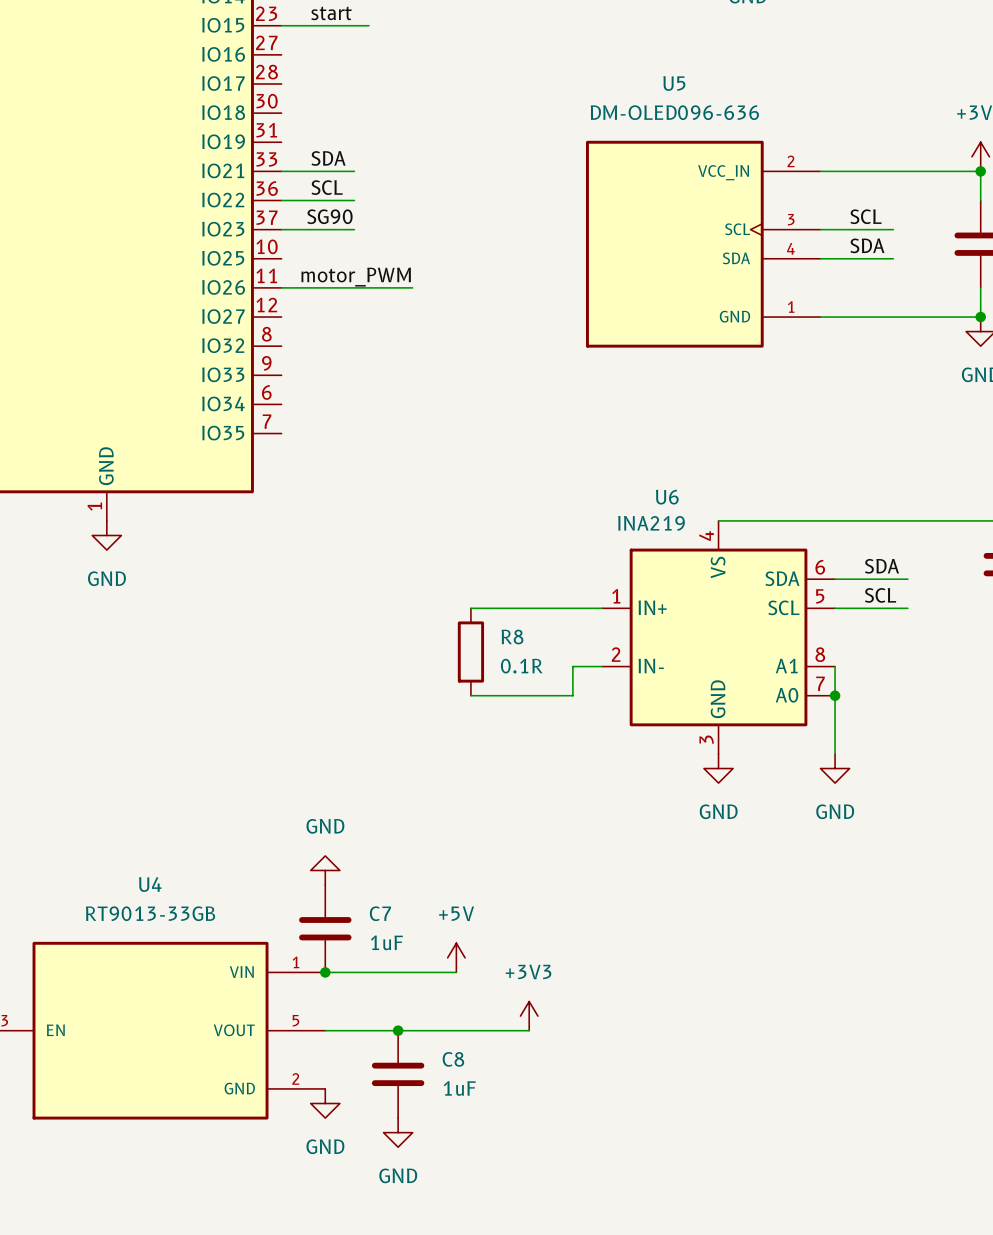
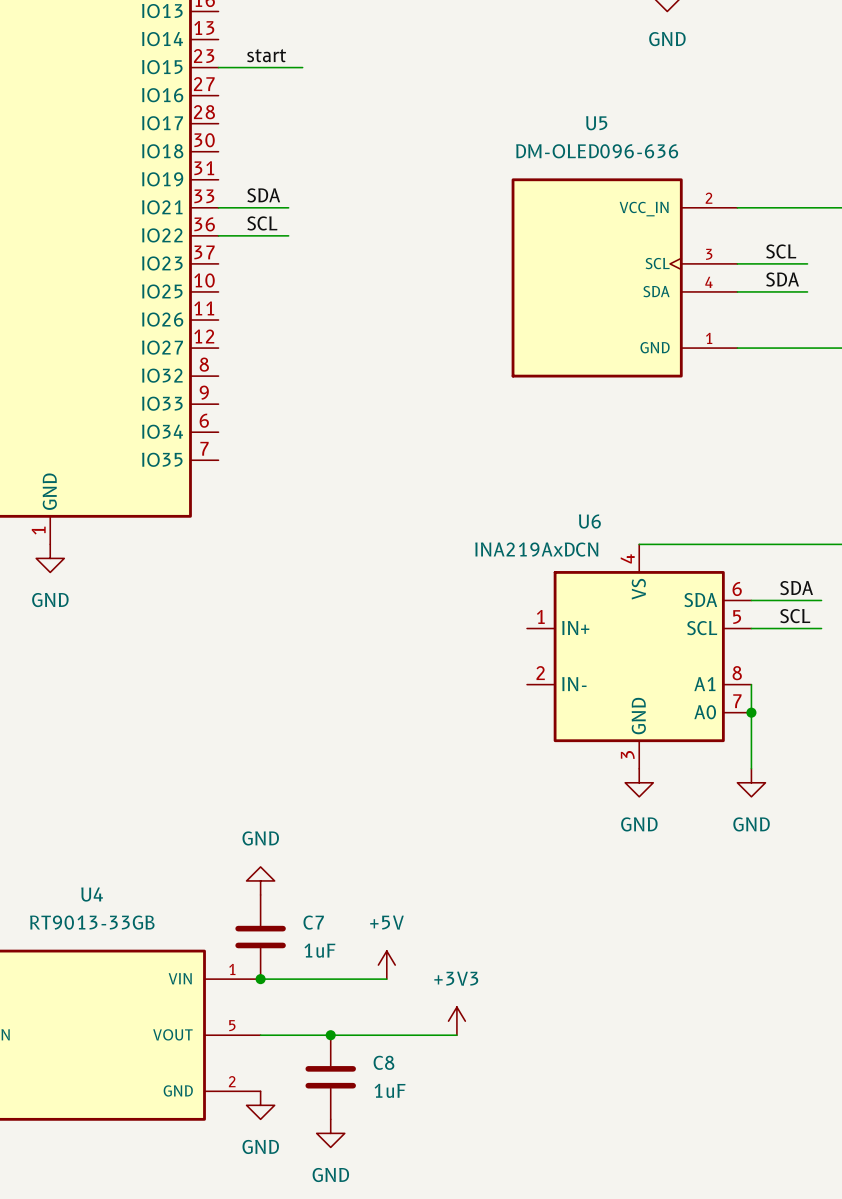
label: SG90 (329, 216) -> none
wire: (281, 229) (354, 229) -> none
label: motor_PWM (356, 277) -> none
wire: (281, 287) (412, 287) -> none
U6 value: INA219 (651, 523) -> INA219AxDCN (536, 549)
wire: (470, 608) (602, 608) -> none
R8: 0.1R (470, 652) -> none
wire: (602, 666) (572, 666) (572, 695) (470, 695) -> none

